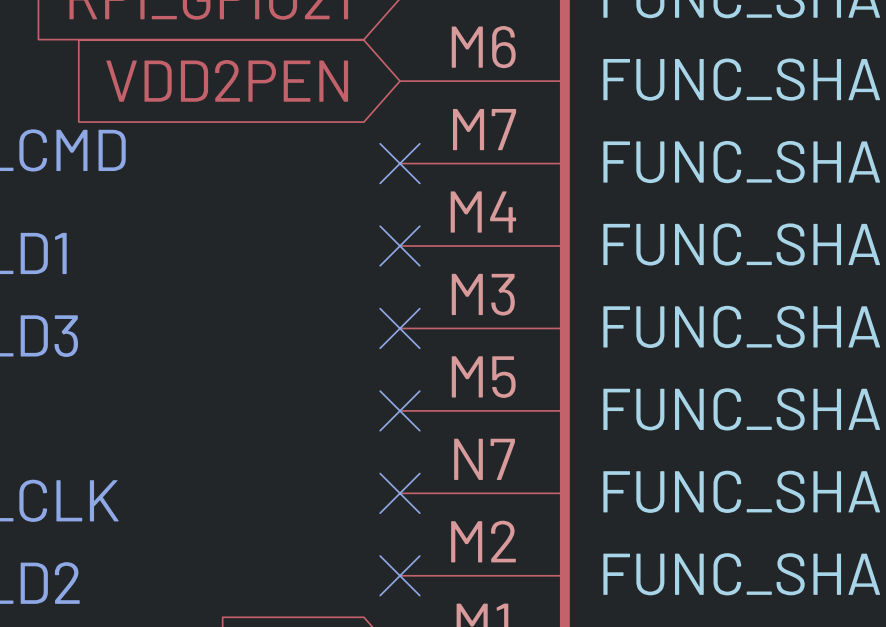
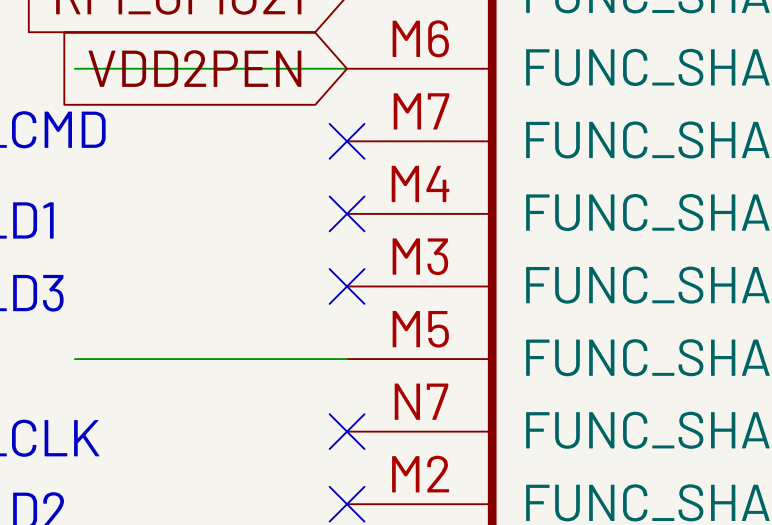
wire: none -> (74, 68) (347, 68)
wire: none -> (74, 359) (347, 359)
no-connect mark: (399, 410) -> none

